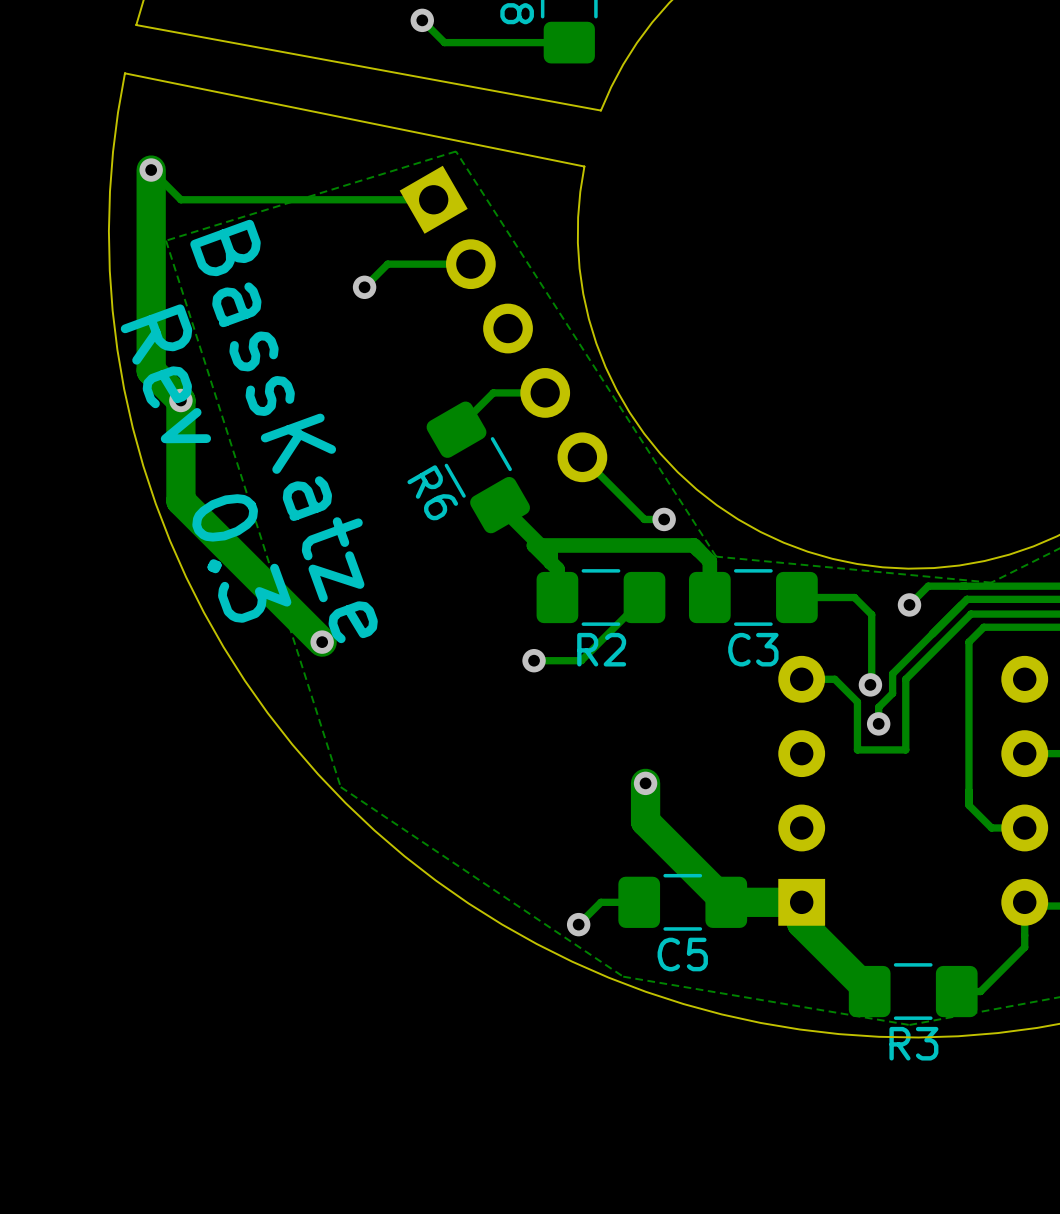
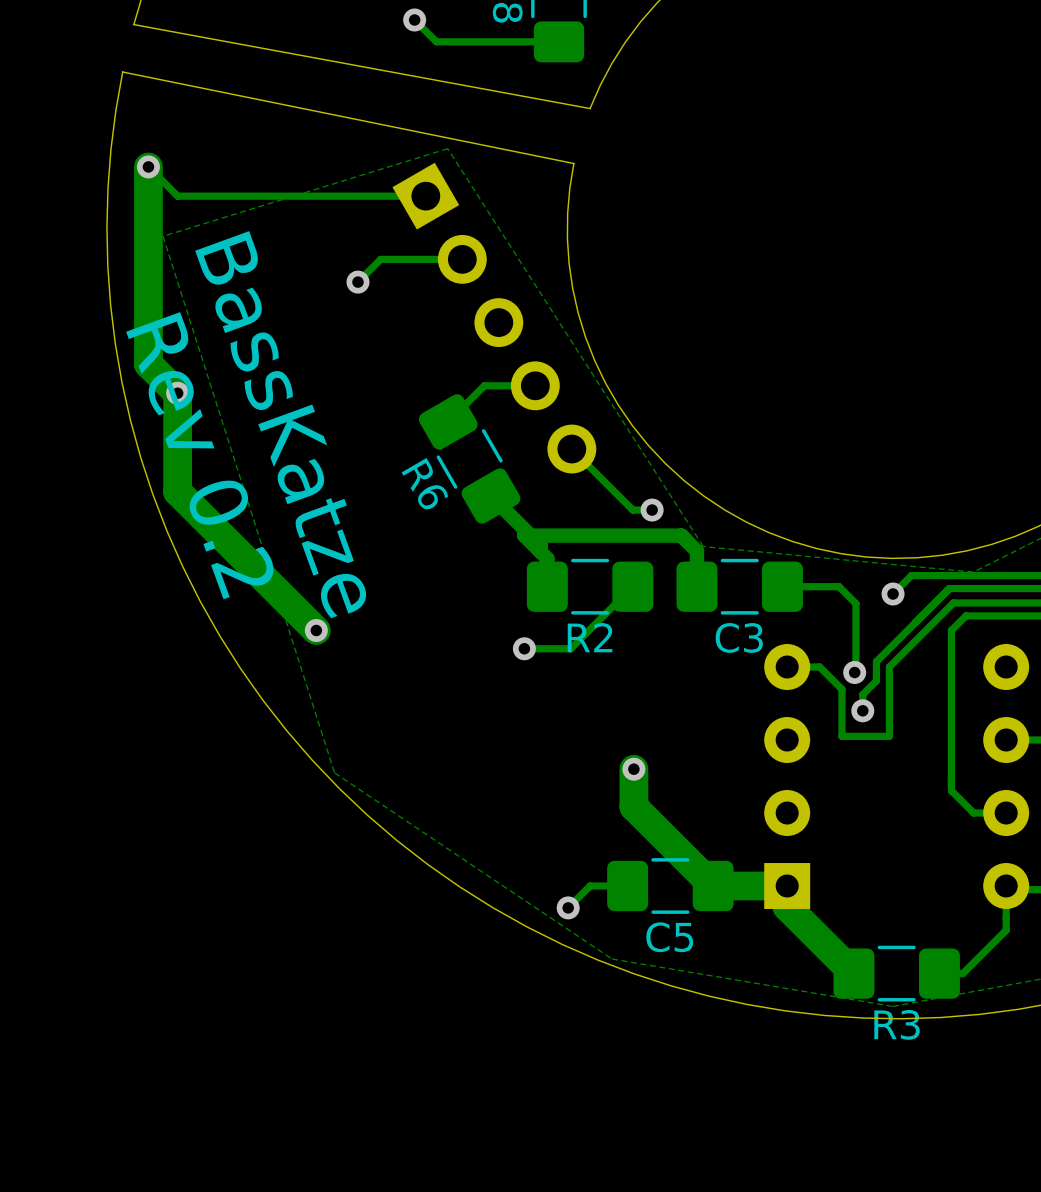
text: Rev 0.3 (206, 463) -> Rev 0.2 (200, 455)

